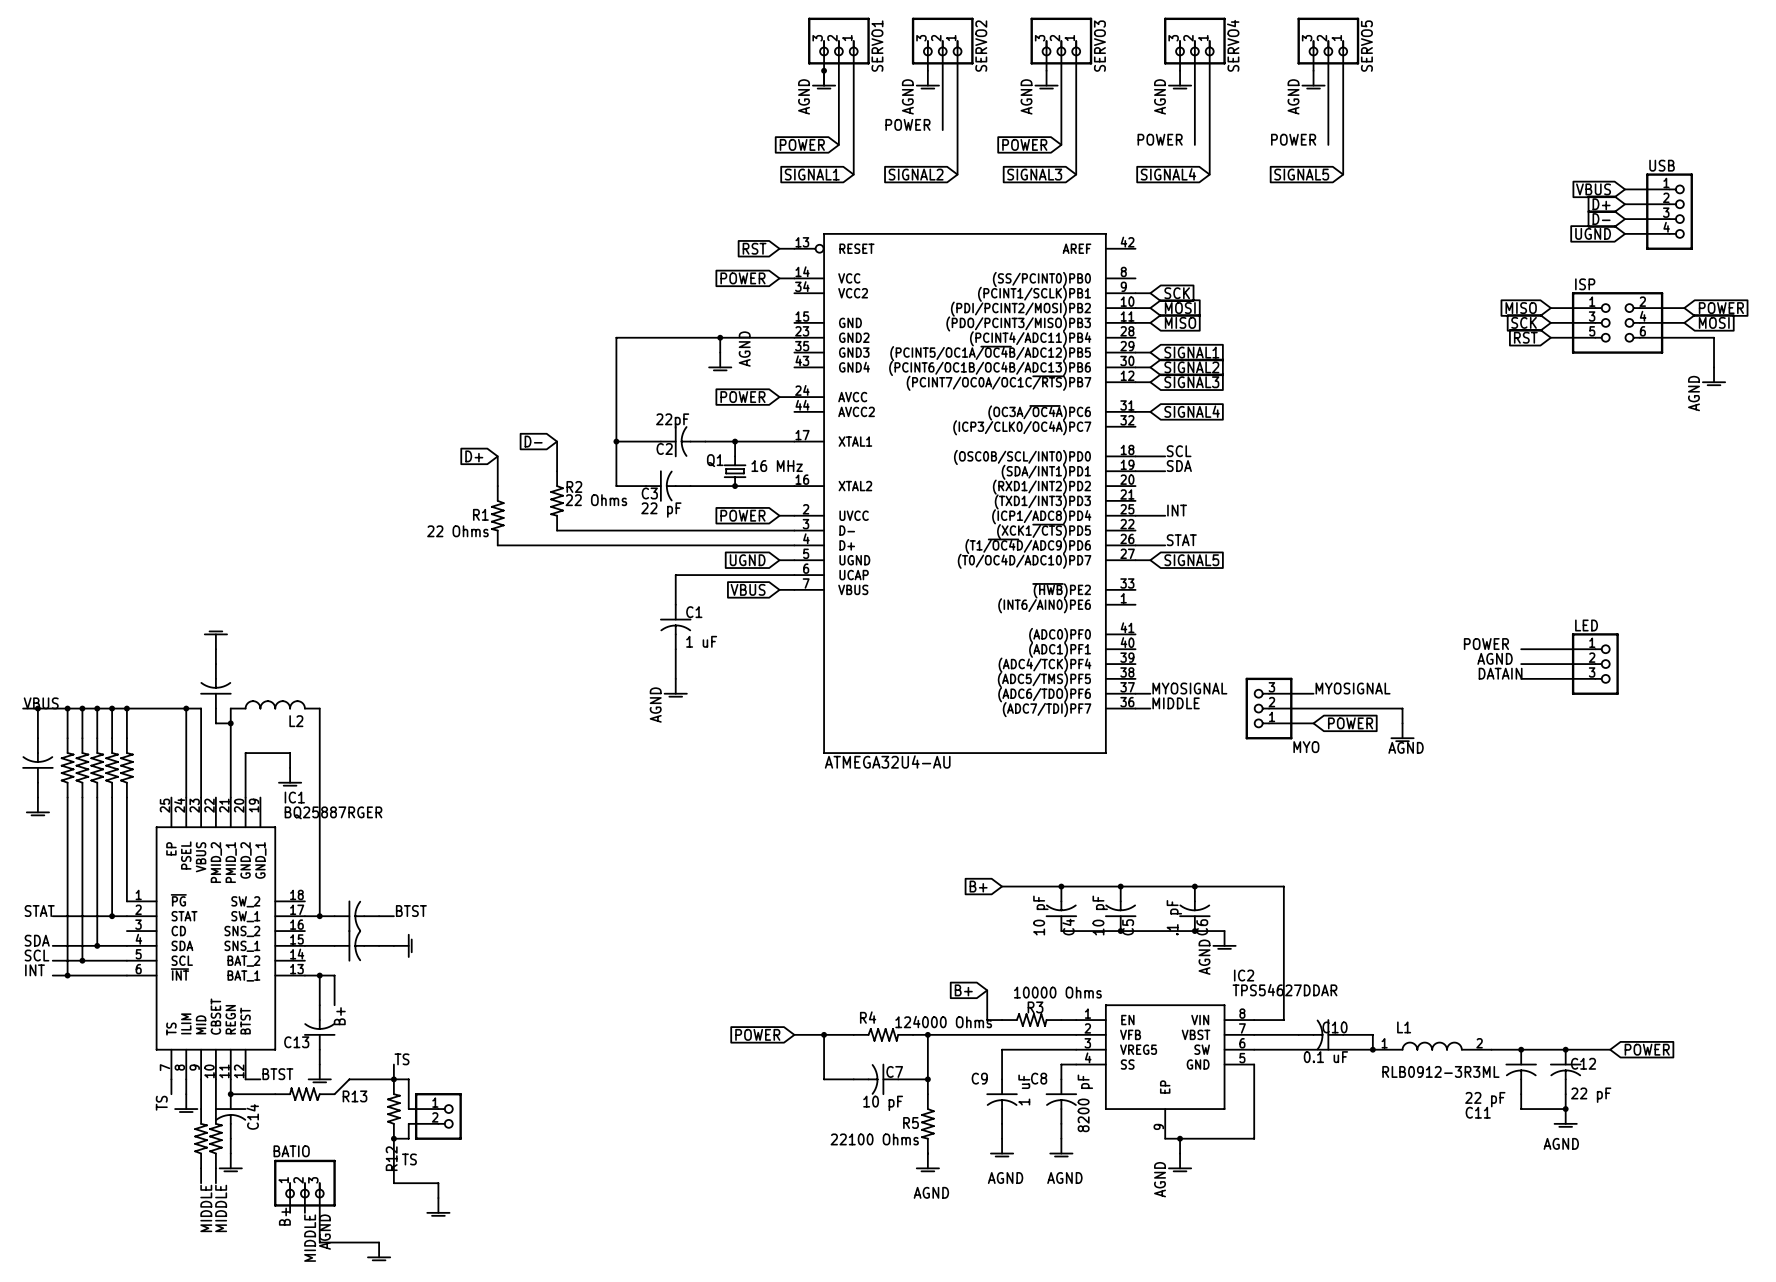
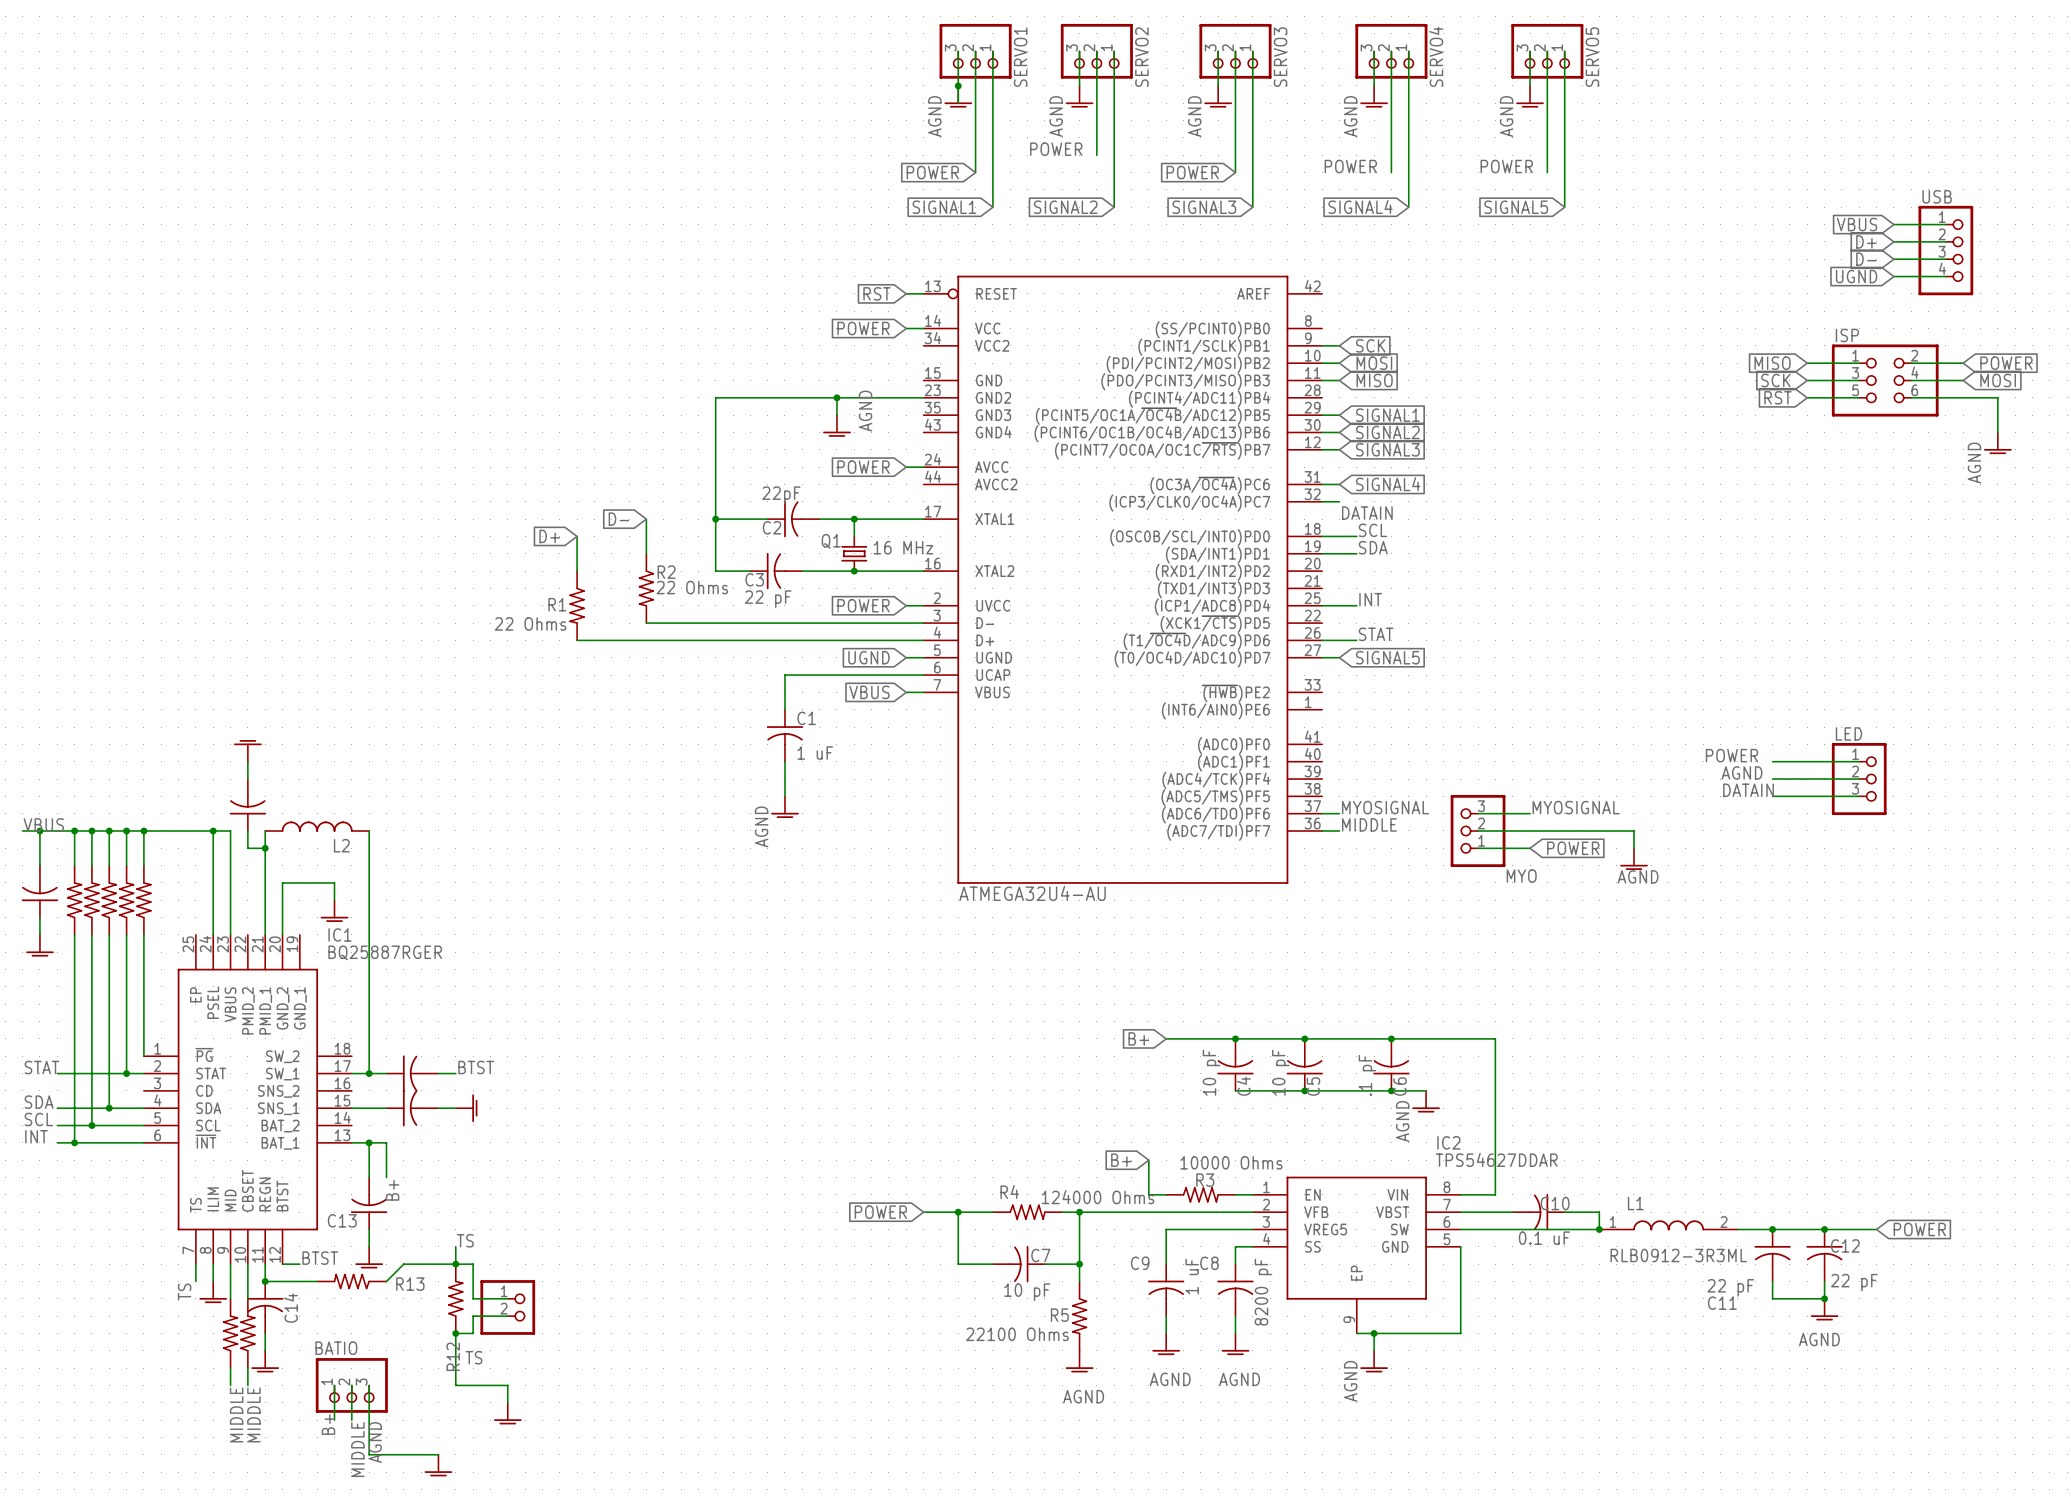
wire: none -> (1322, 501) (1339, 501)
label: none -> DATAIN (1367, 513)

